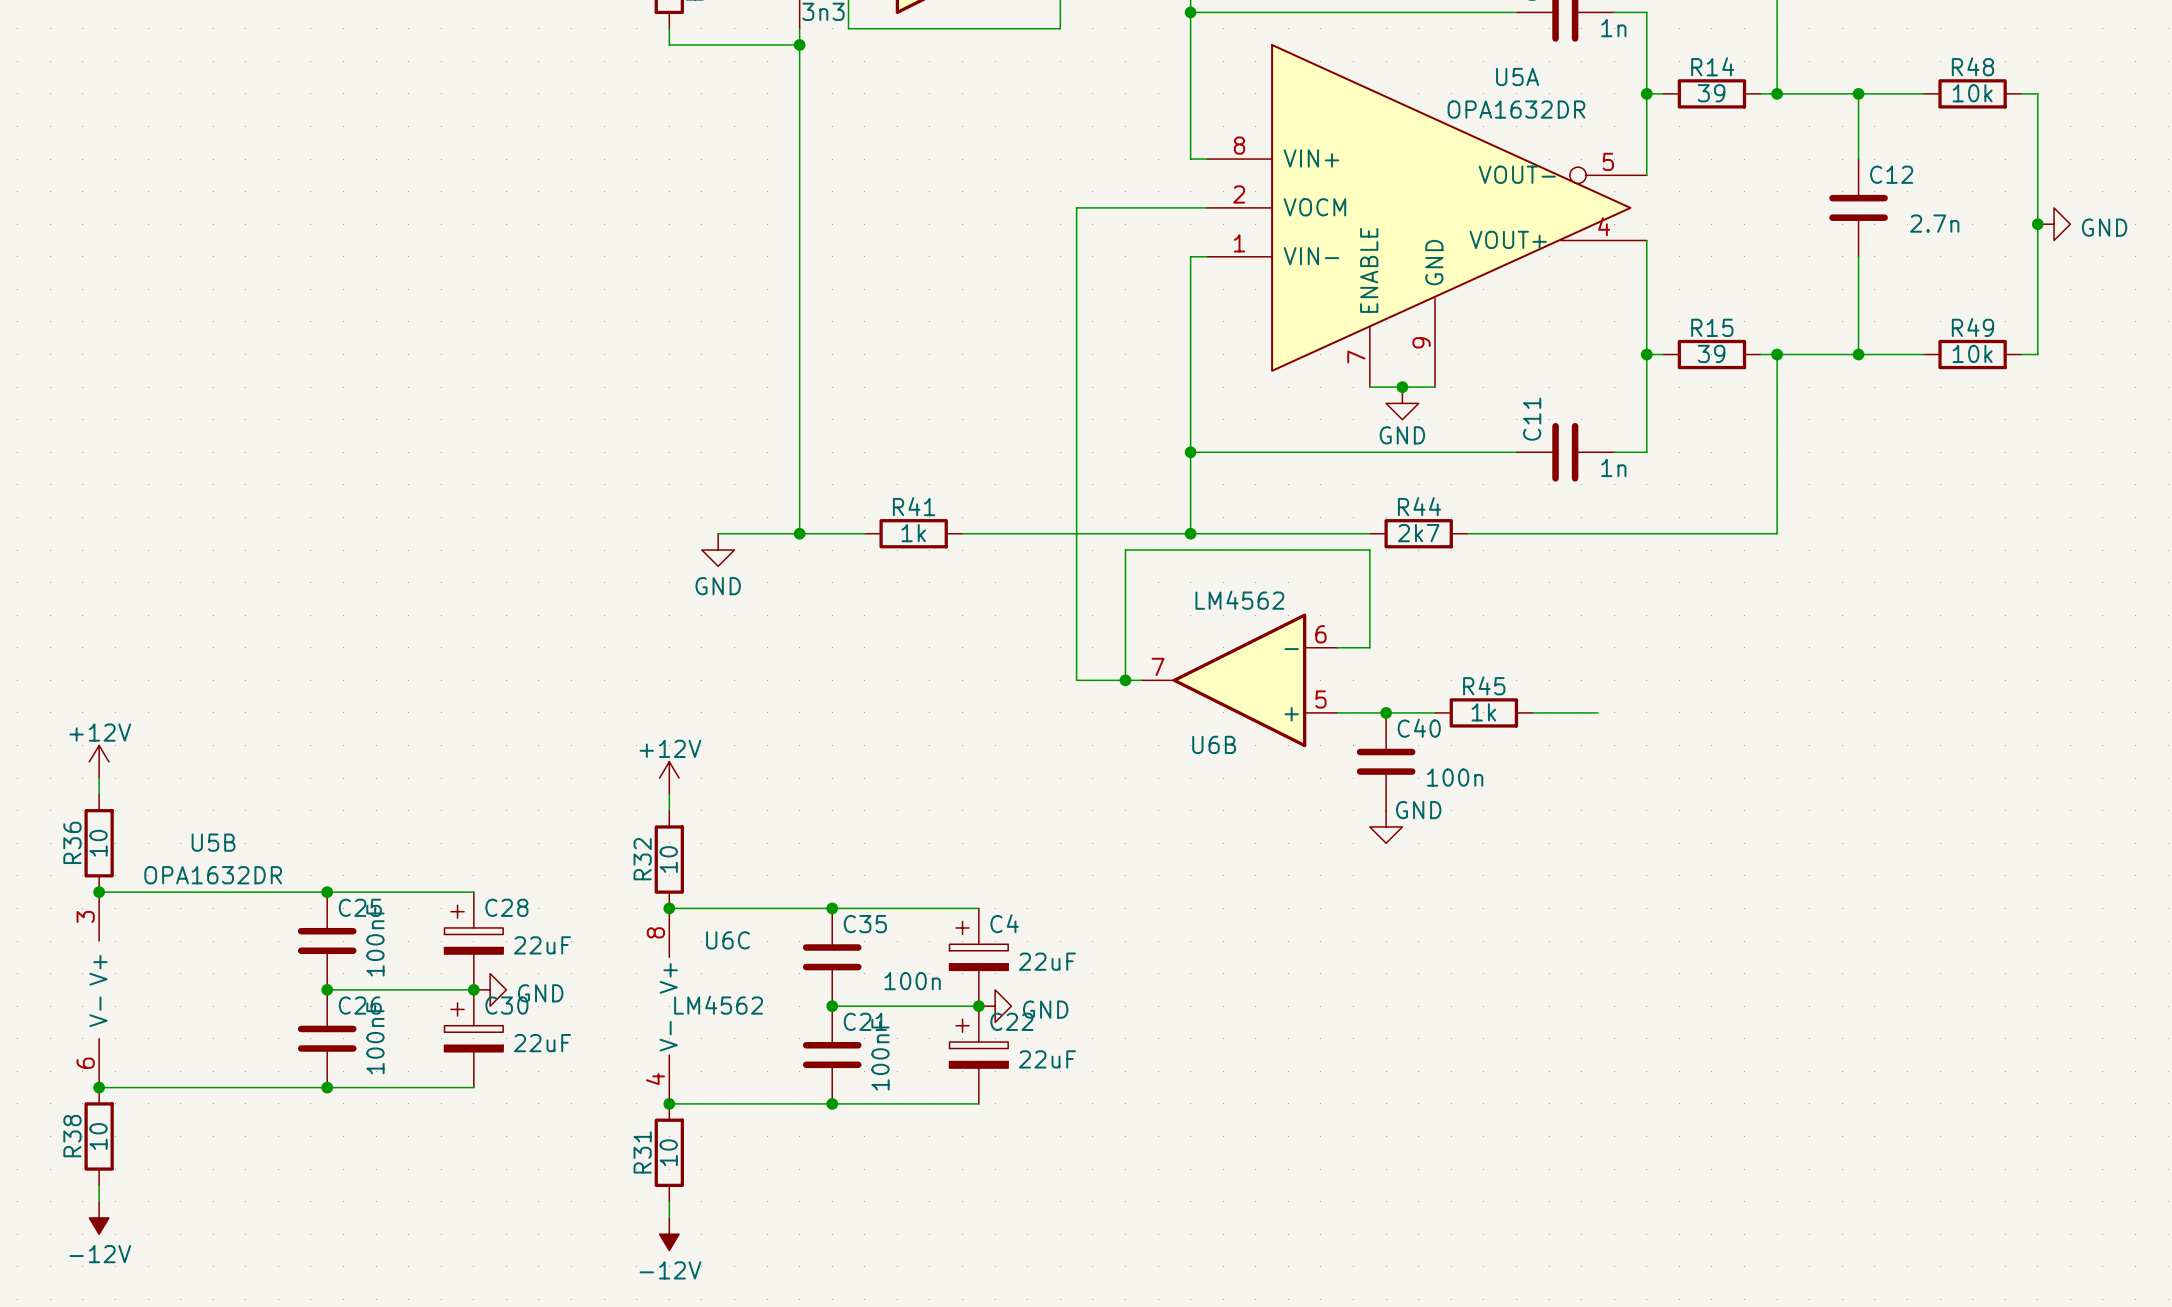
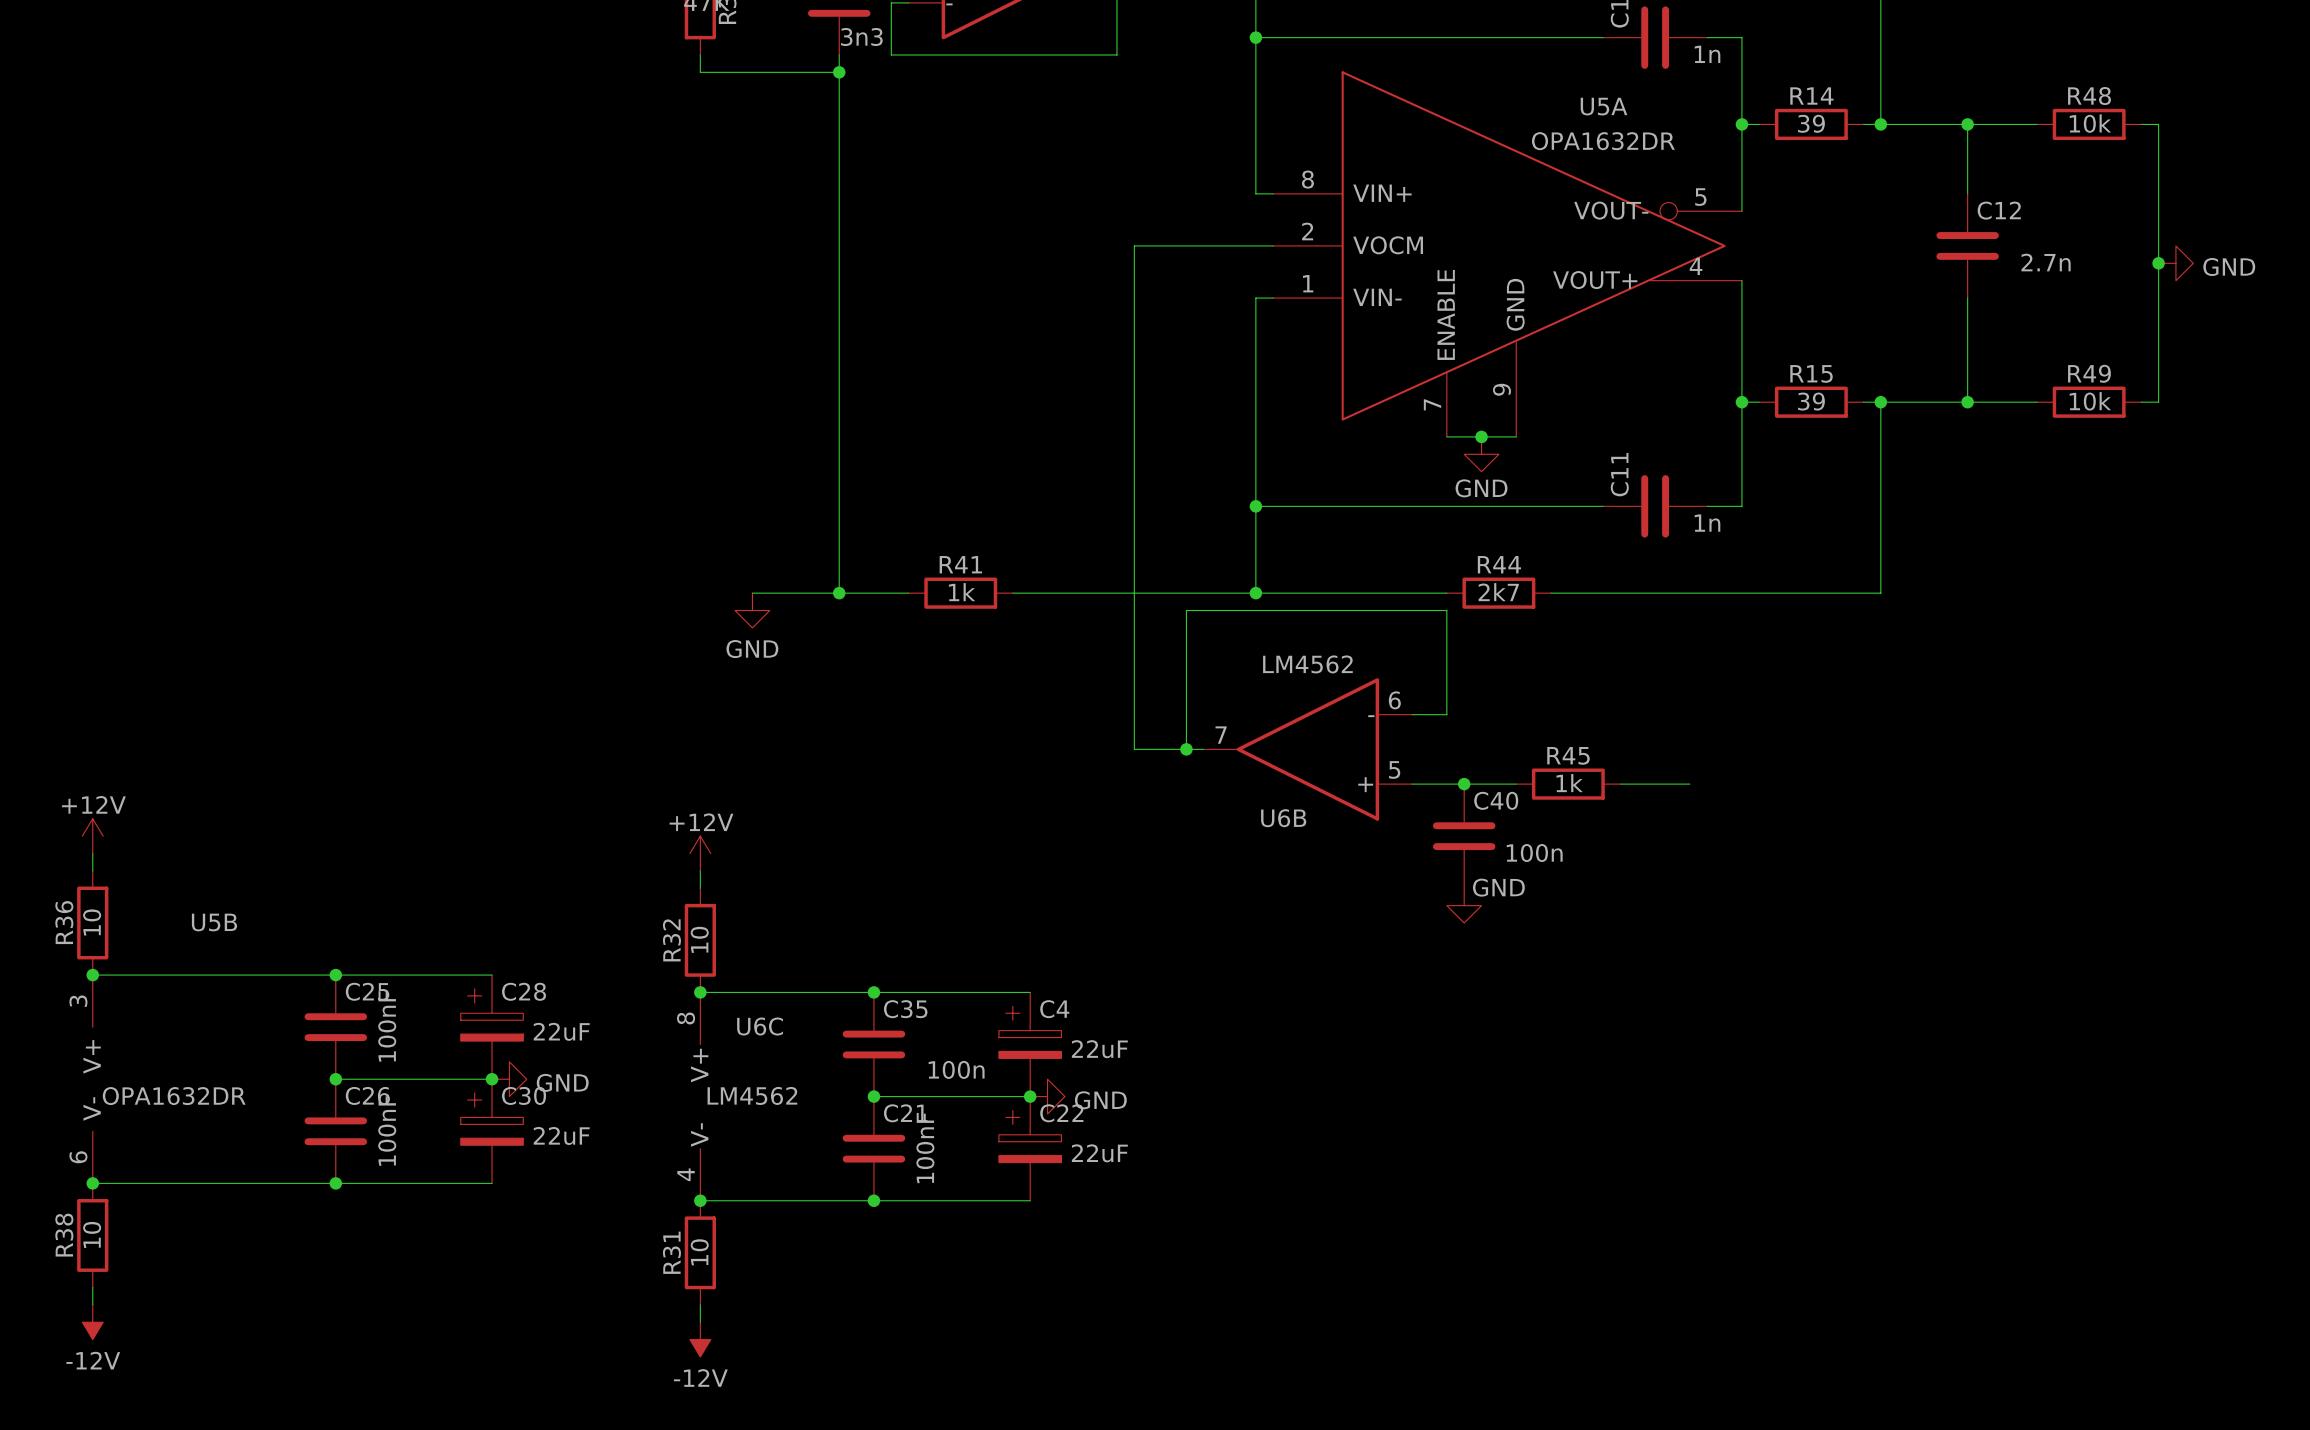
U5B value position: OPA1632DR (213, 875) -> OPA1632DR (174, 1096)

